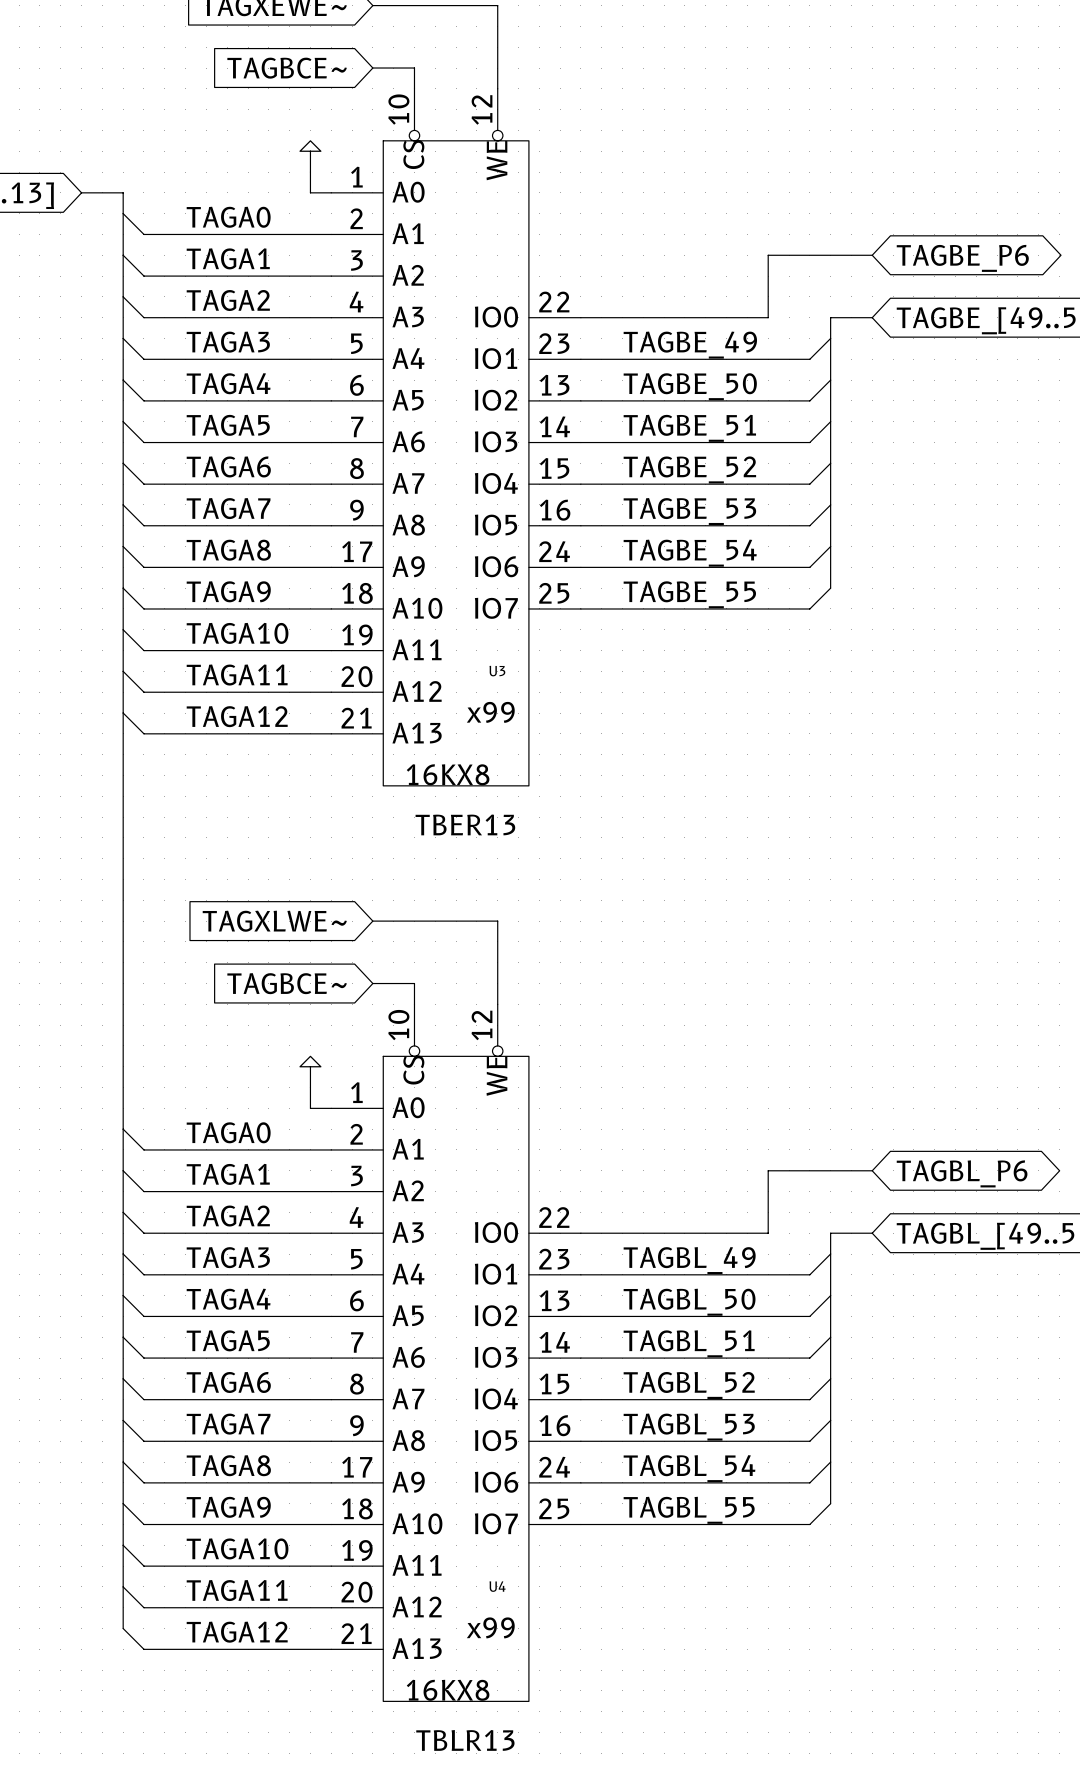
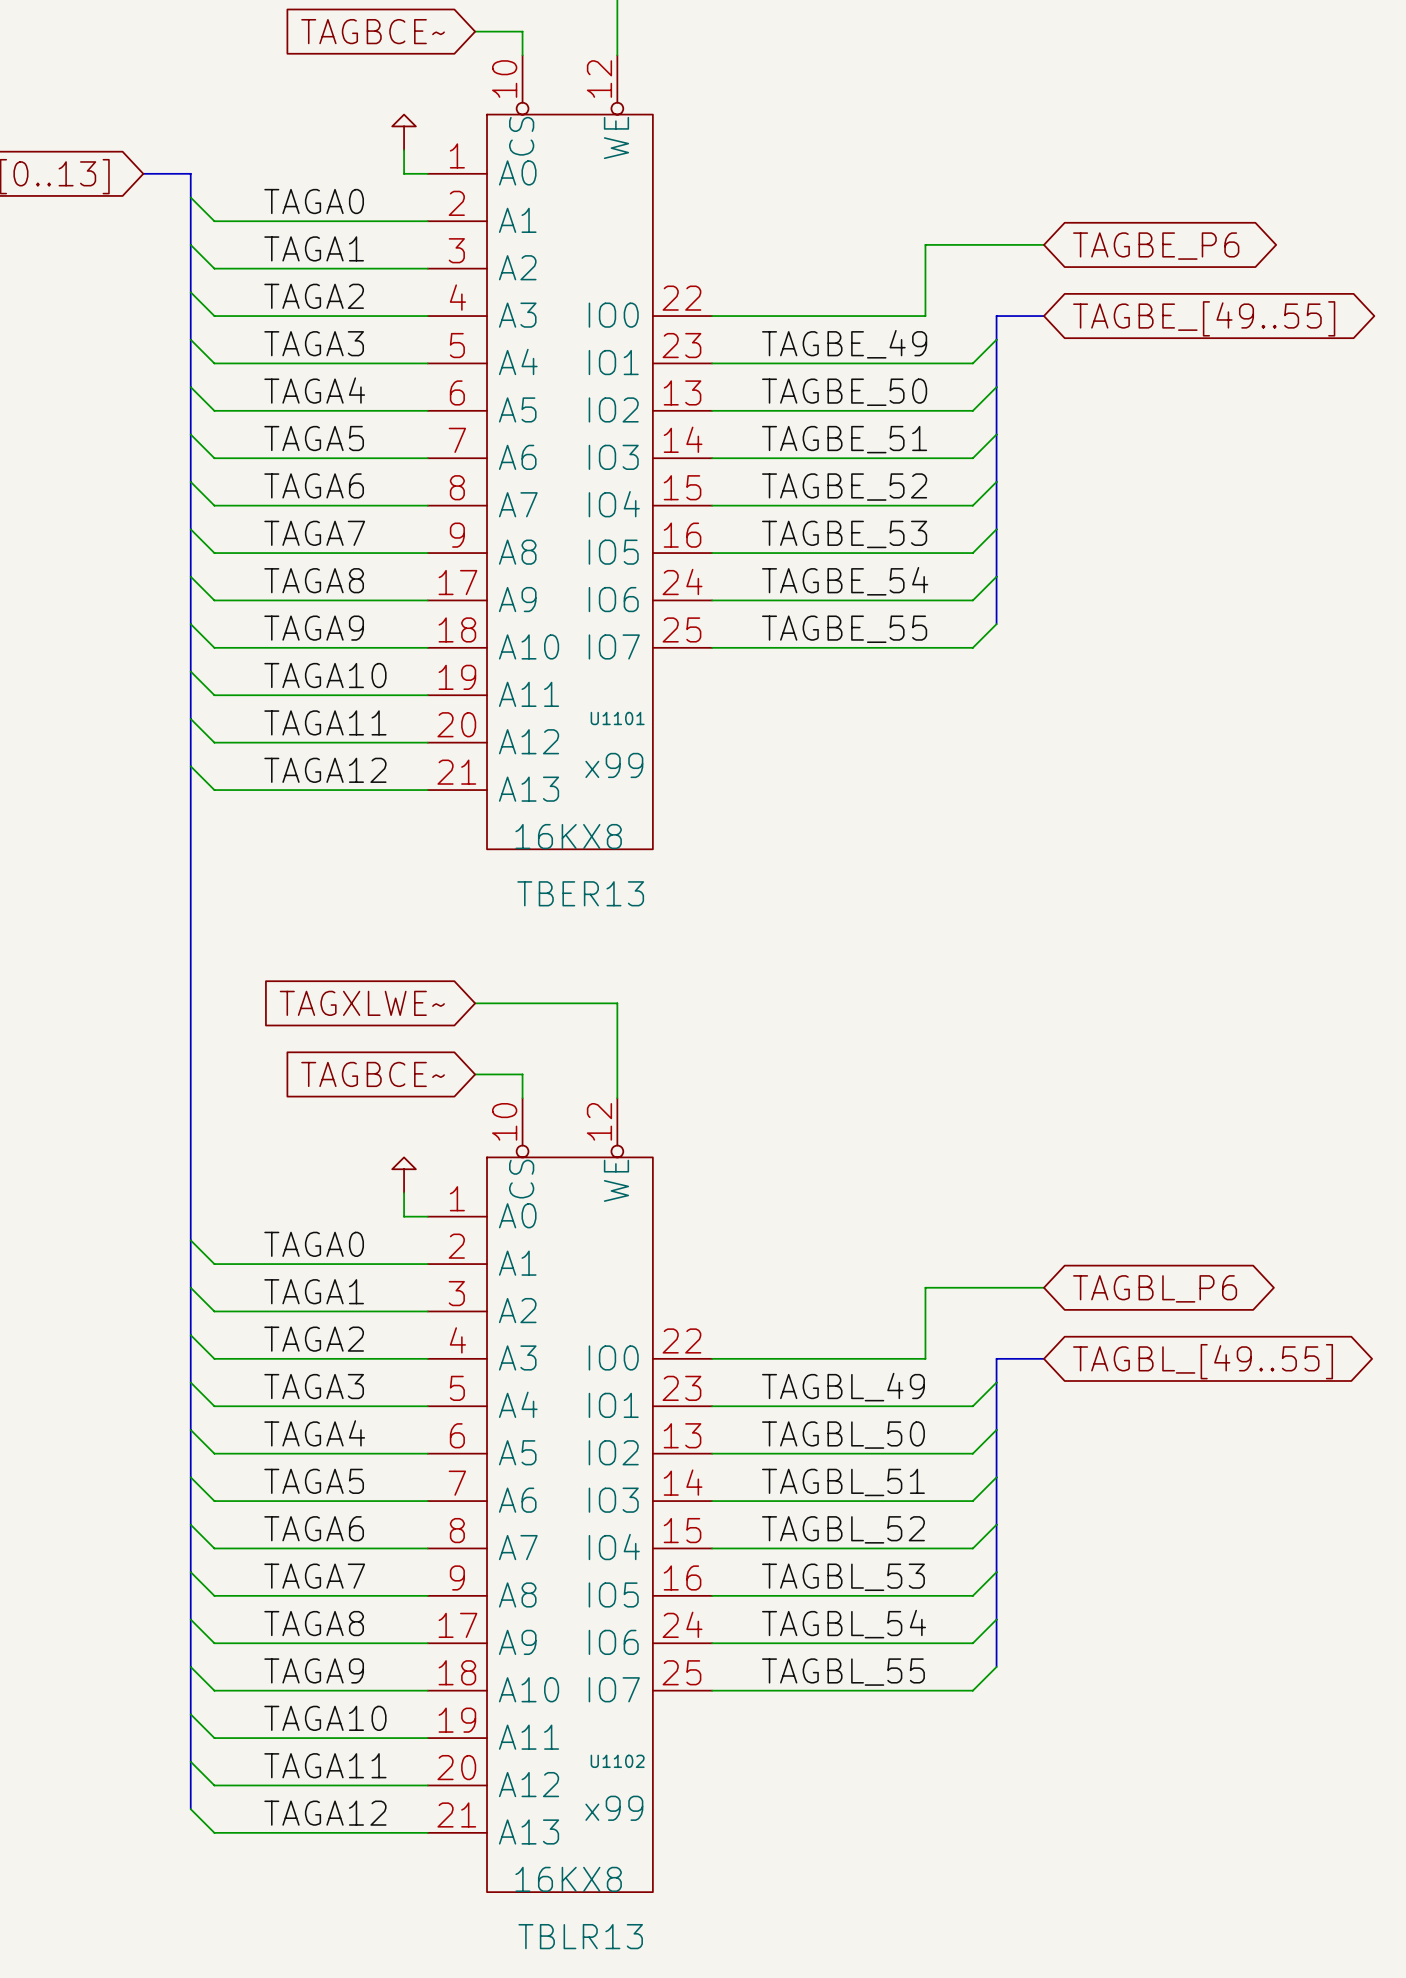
U3 name: U3 (497, 671) -> U1101 (617, 718)
U4 name: U4 (497, 1586) -> U1102 (617, 1761)

